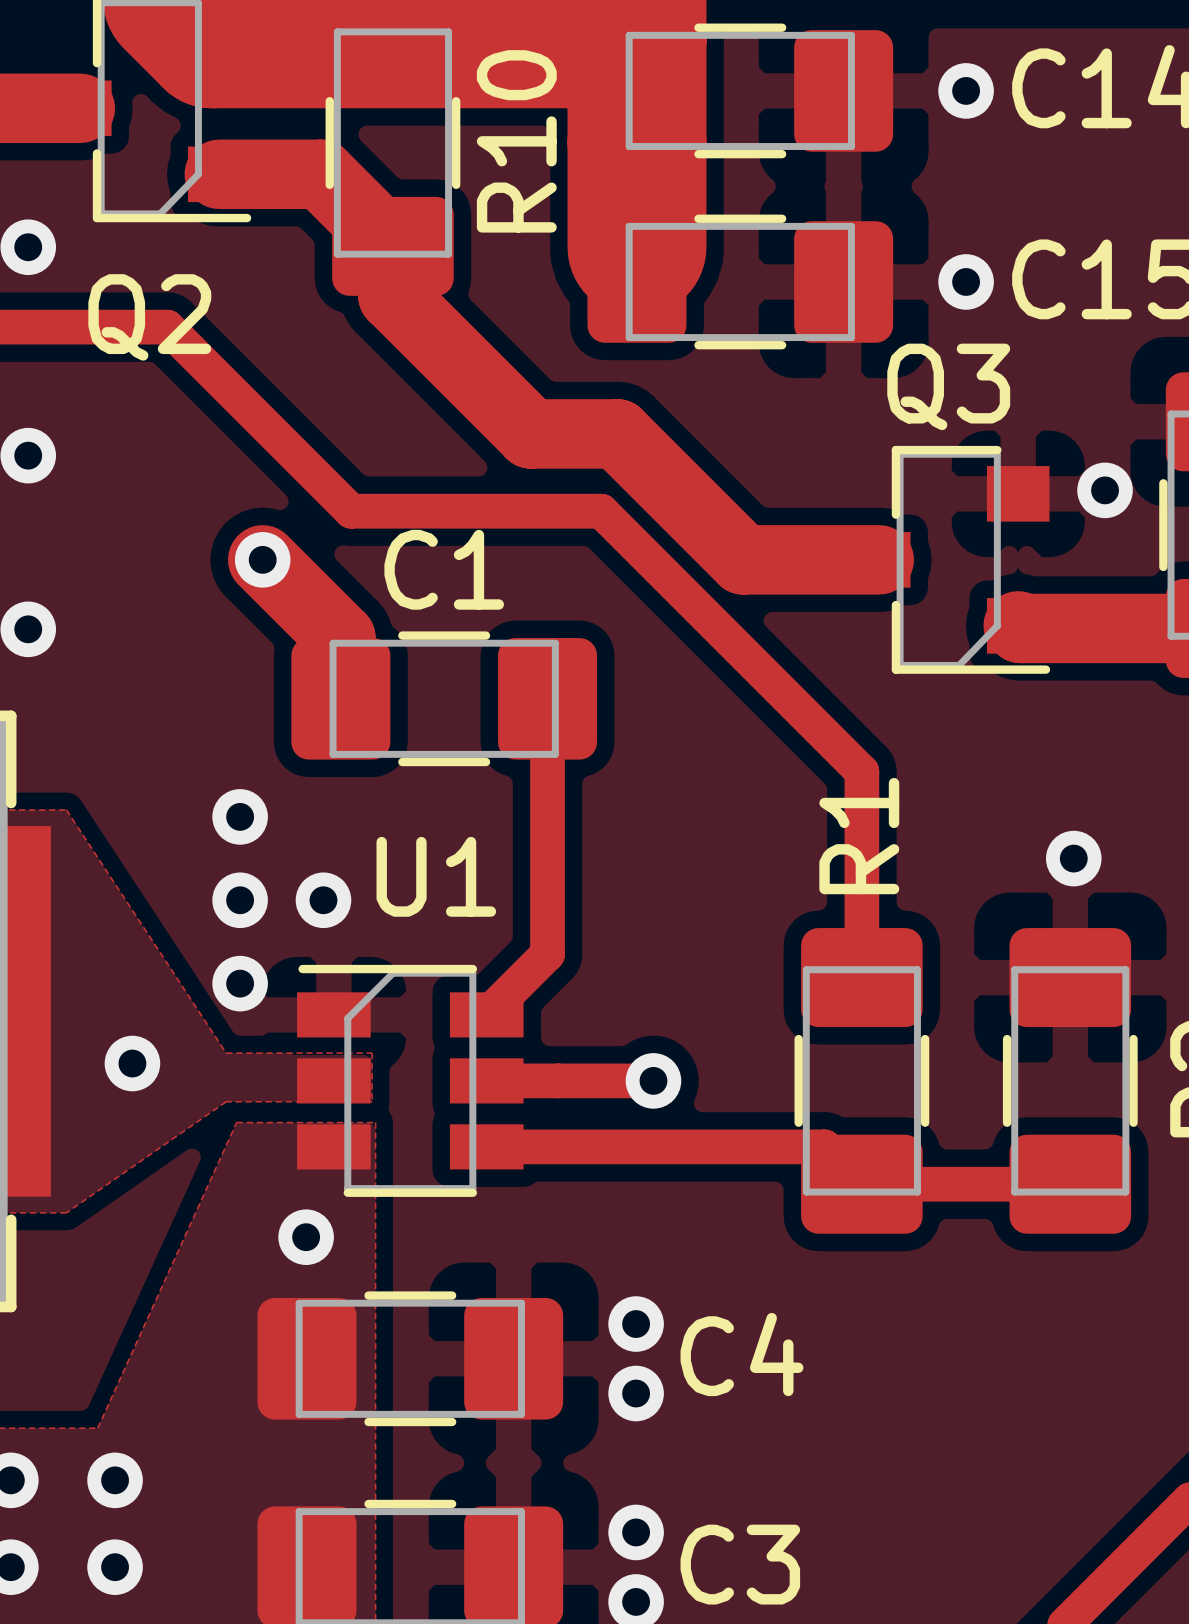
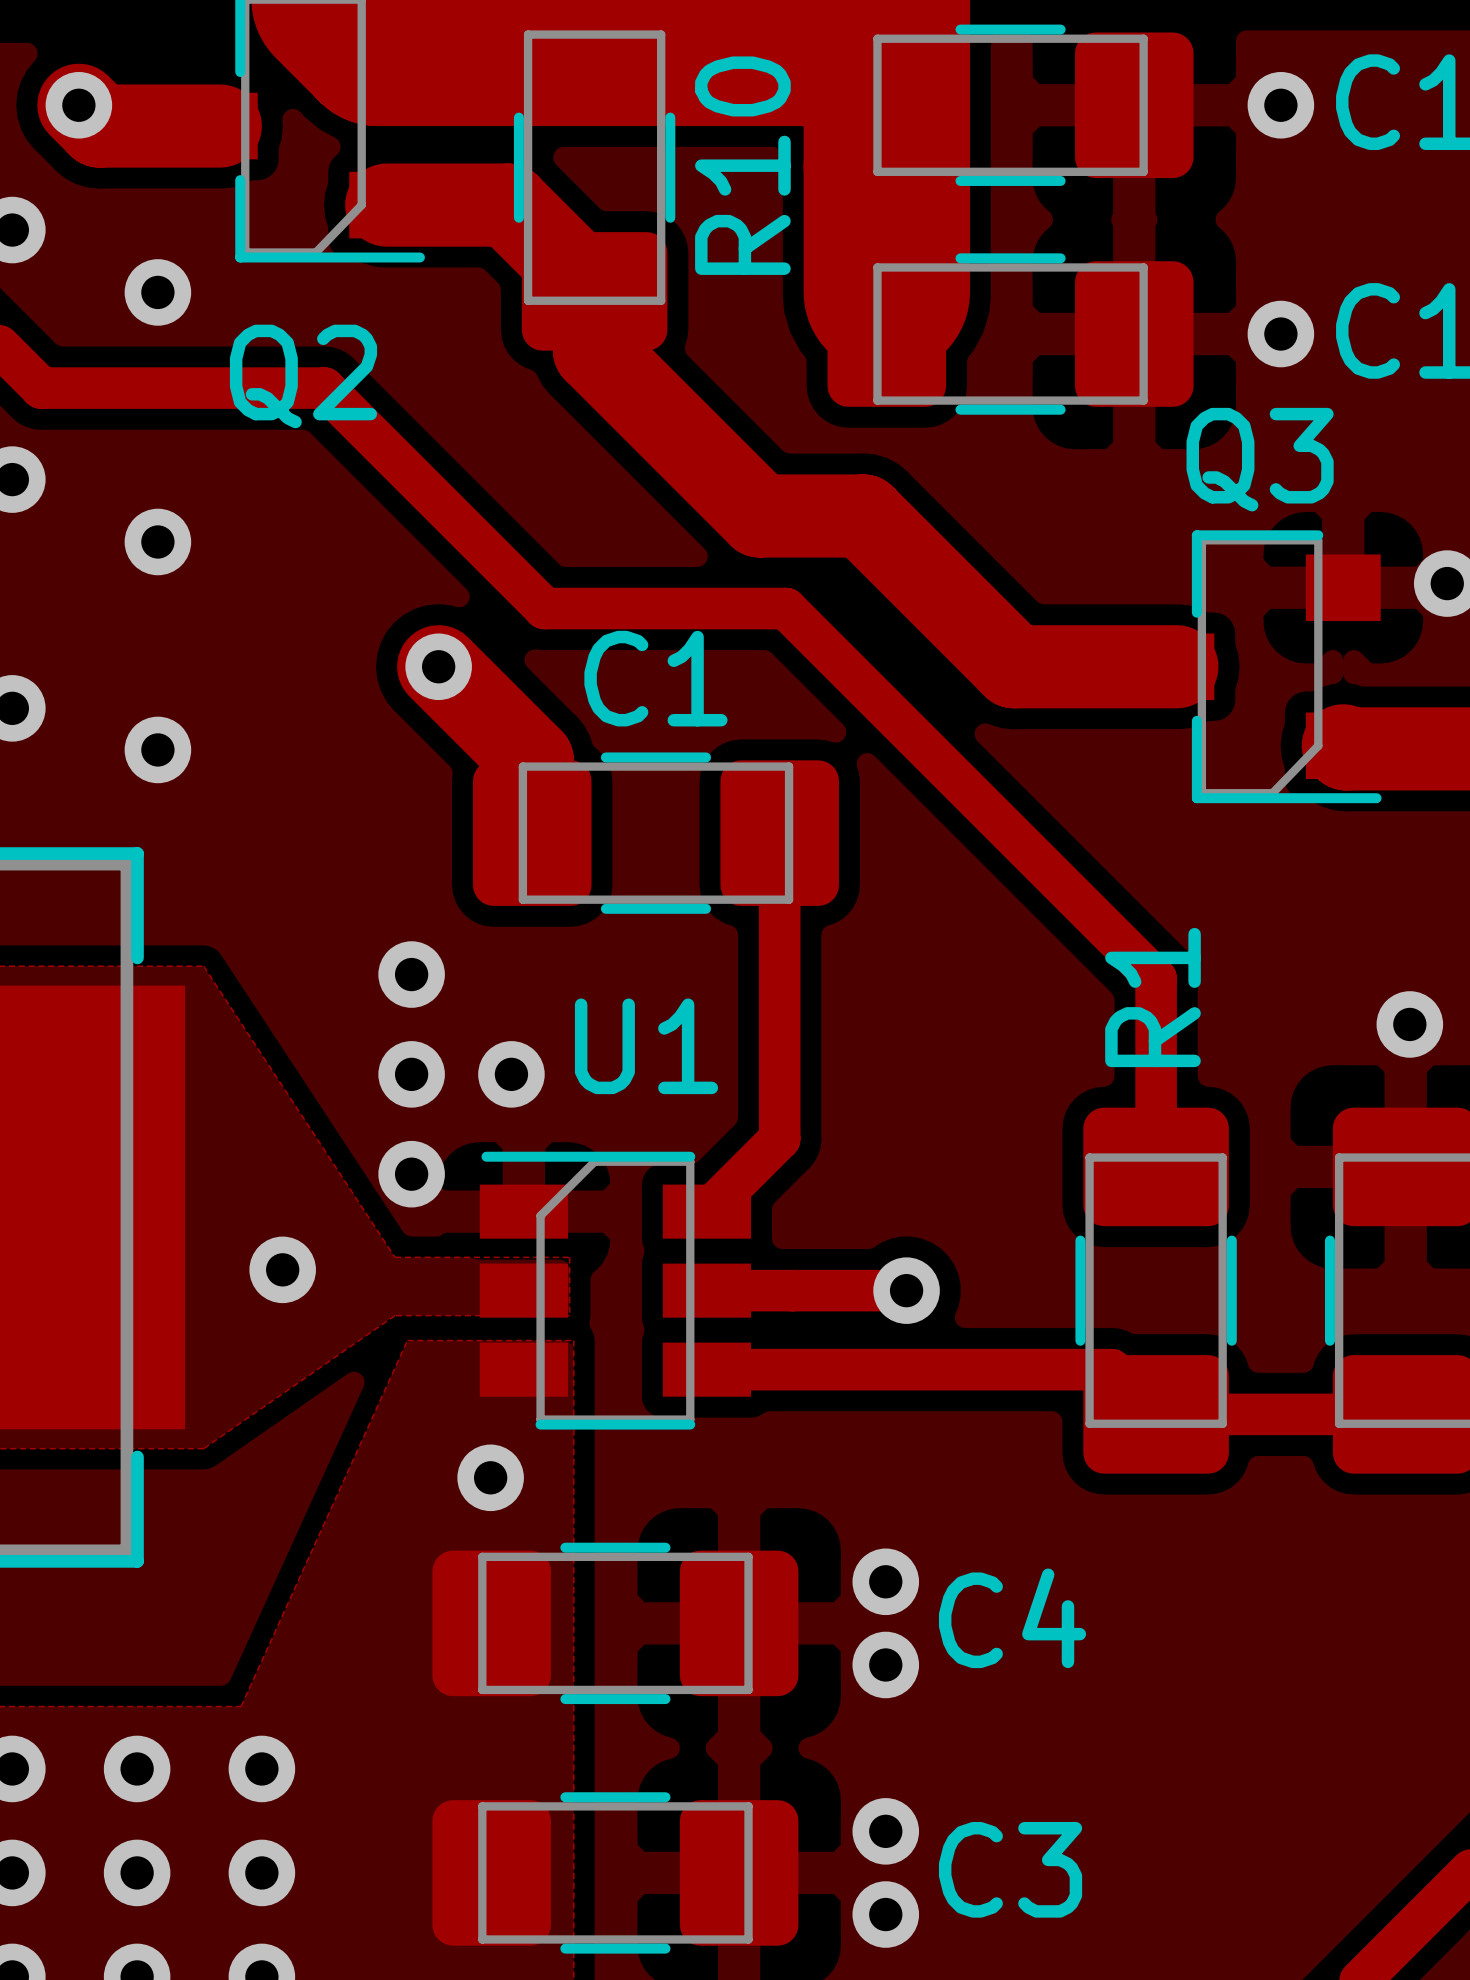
track: (552, 511) (601, 511) (861, 771) (861, 820) -> (785, 608) (1156, 978)

